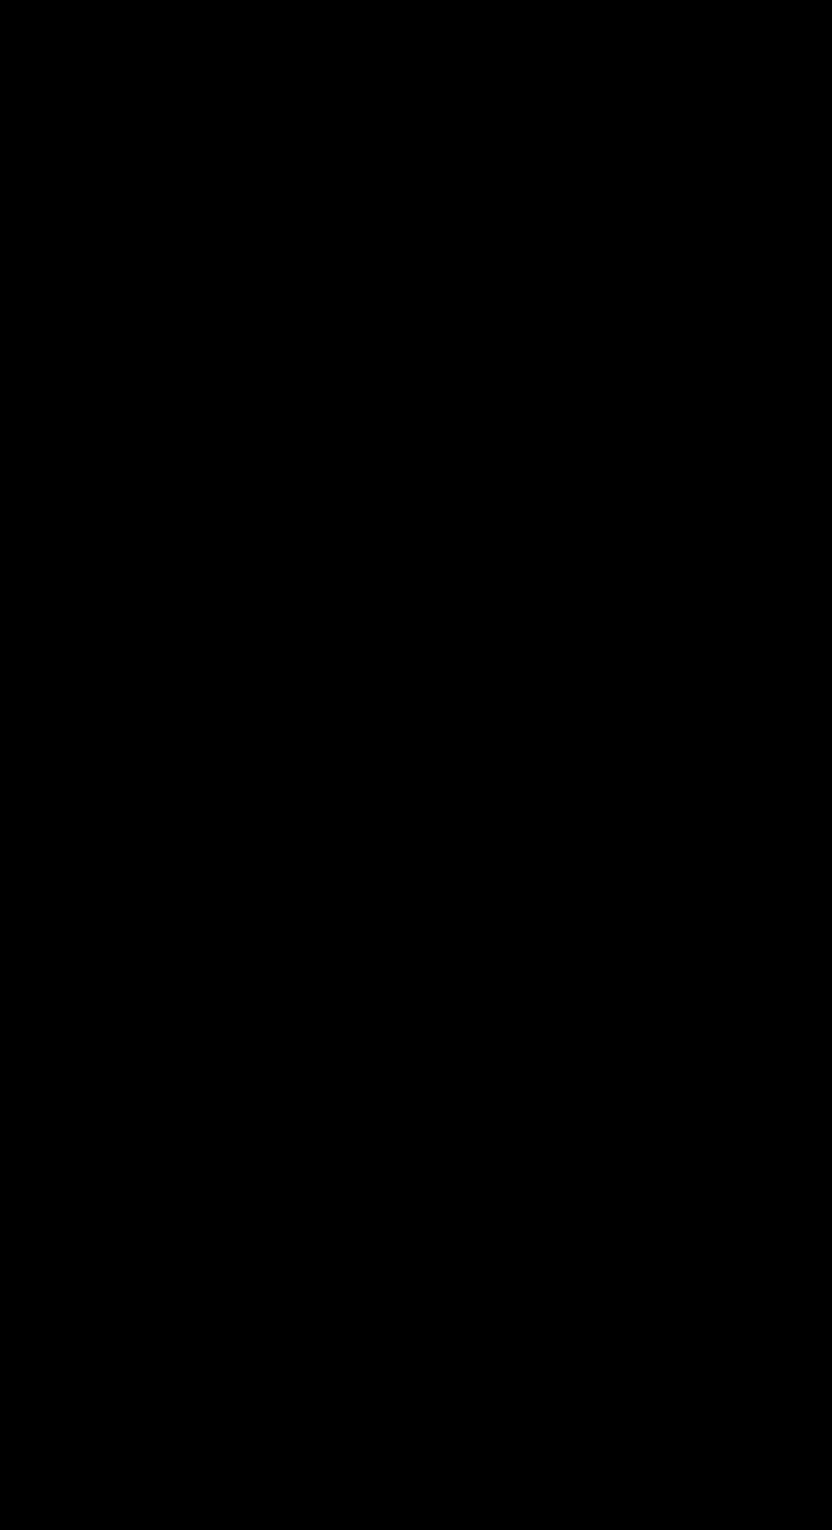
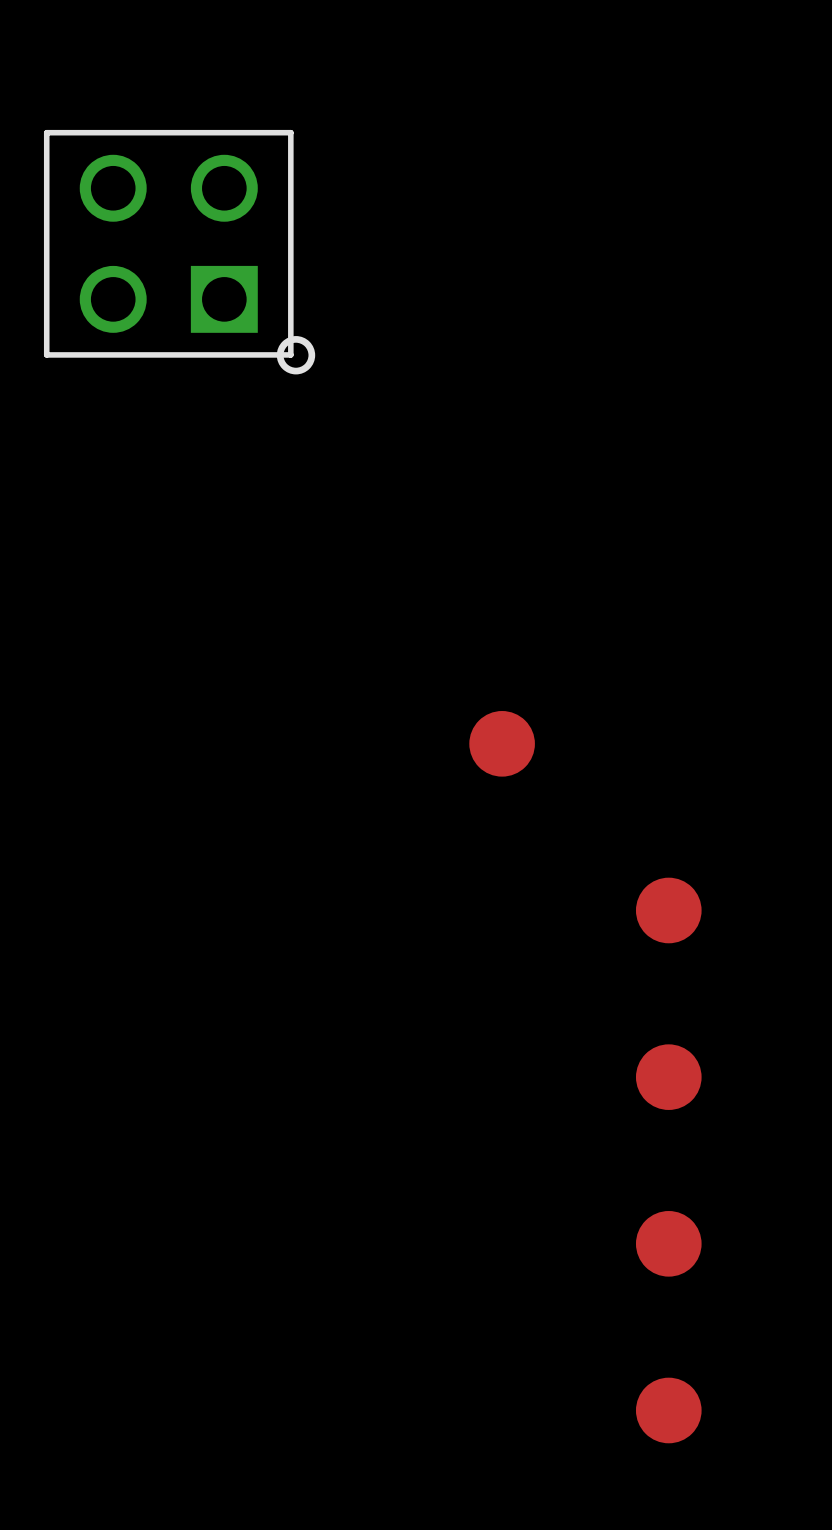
part: none -> (179, 252)
part: none -> (502, 743)
part: none -> (668, 910)
part: none -> (668, 1077)
part: none -> (668, 1243)
part: none -> (668, 1410)

